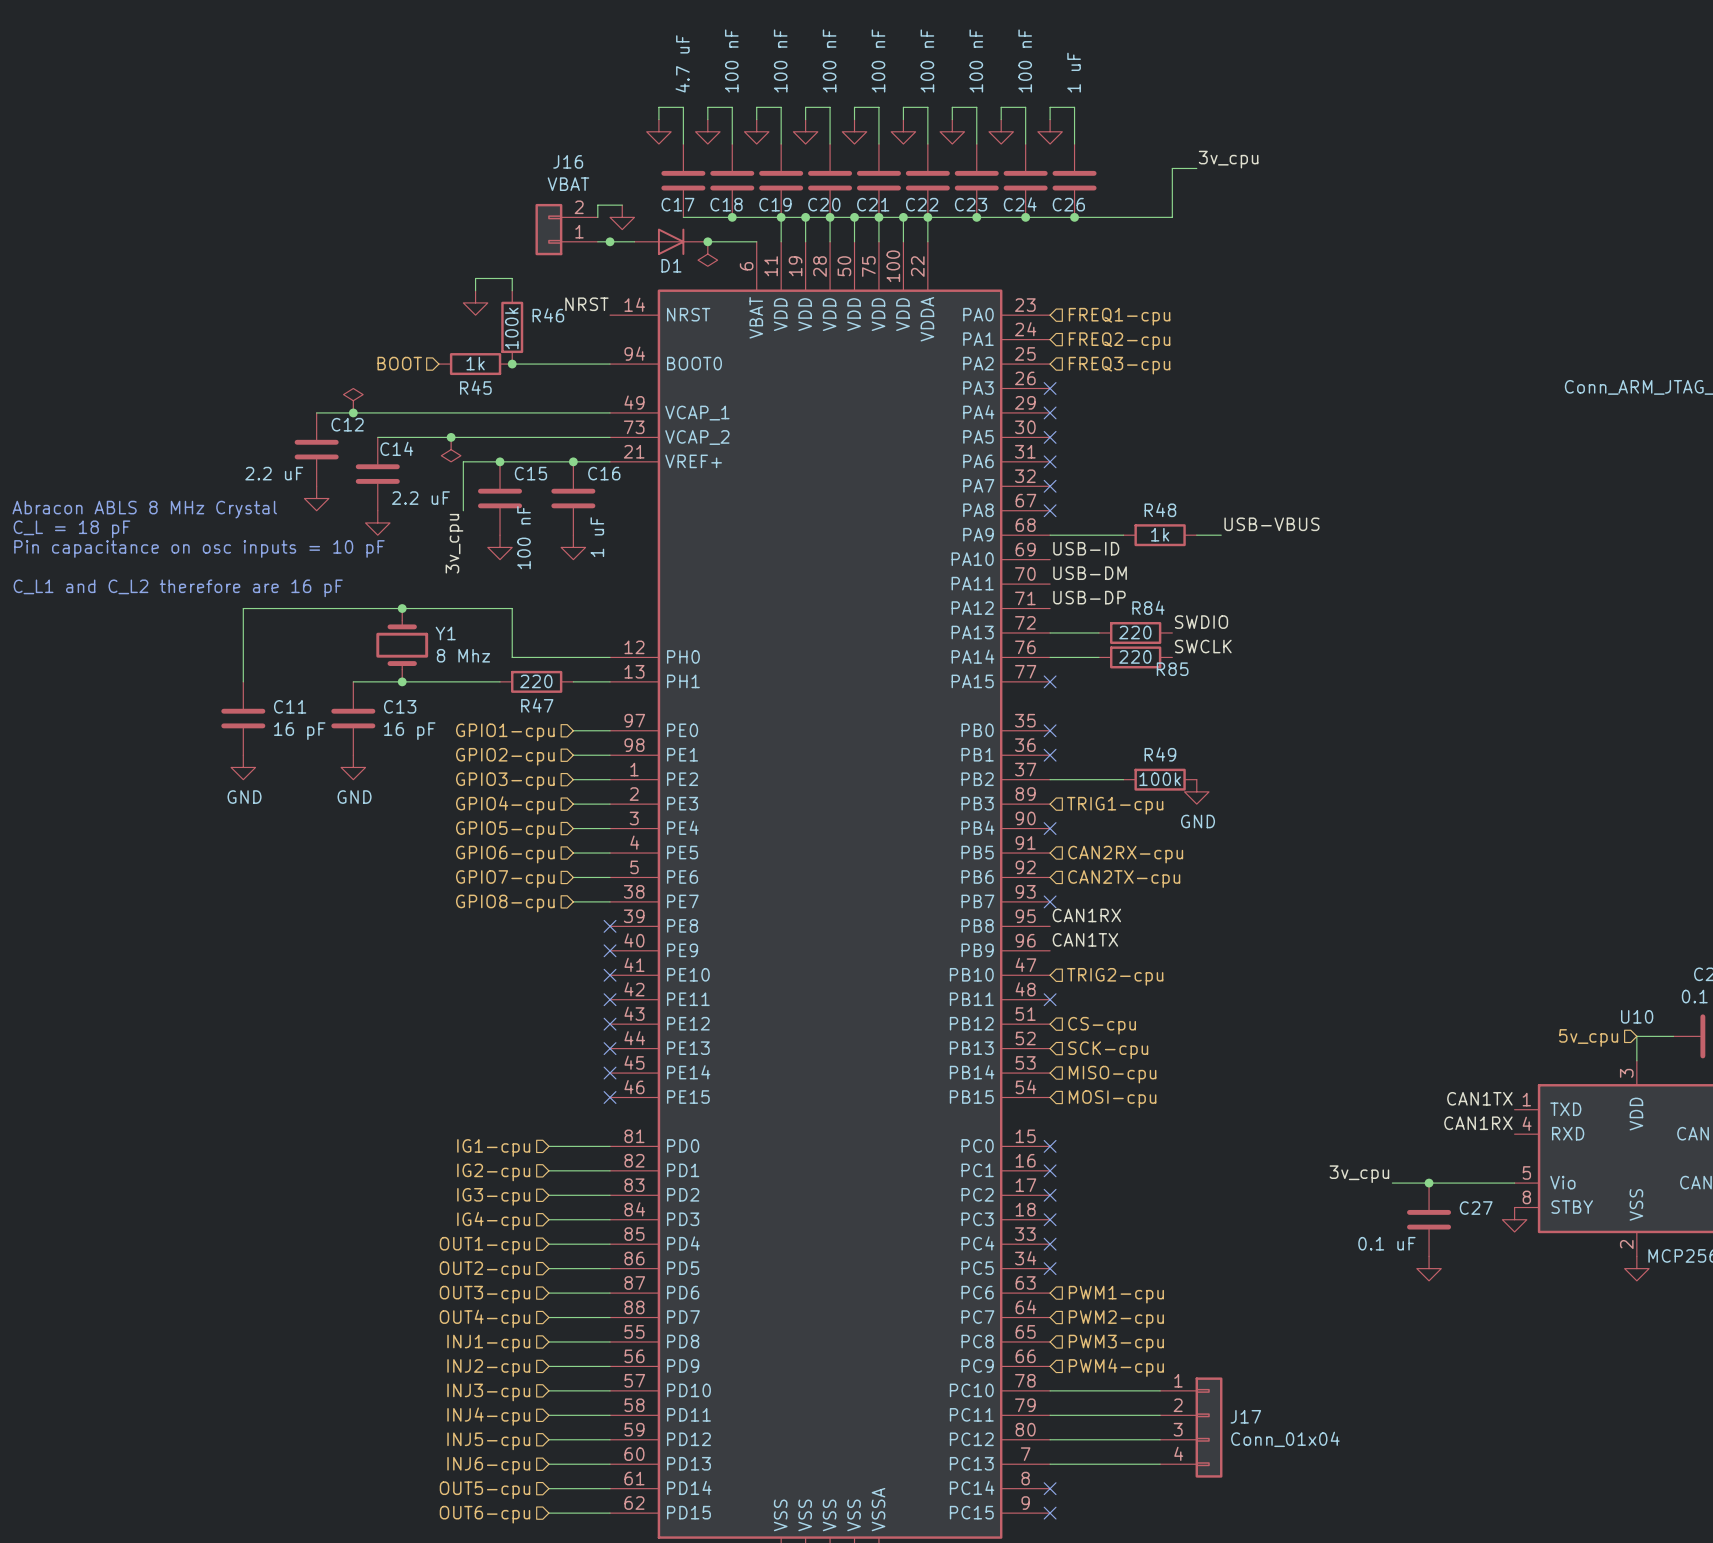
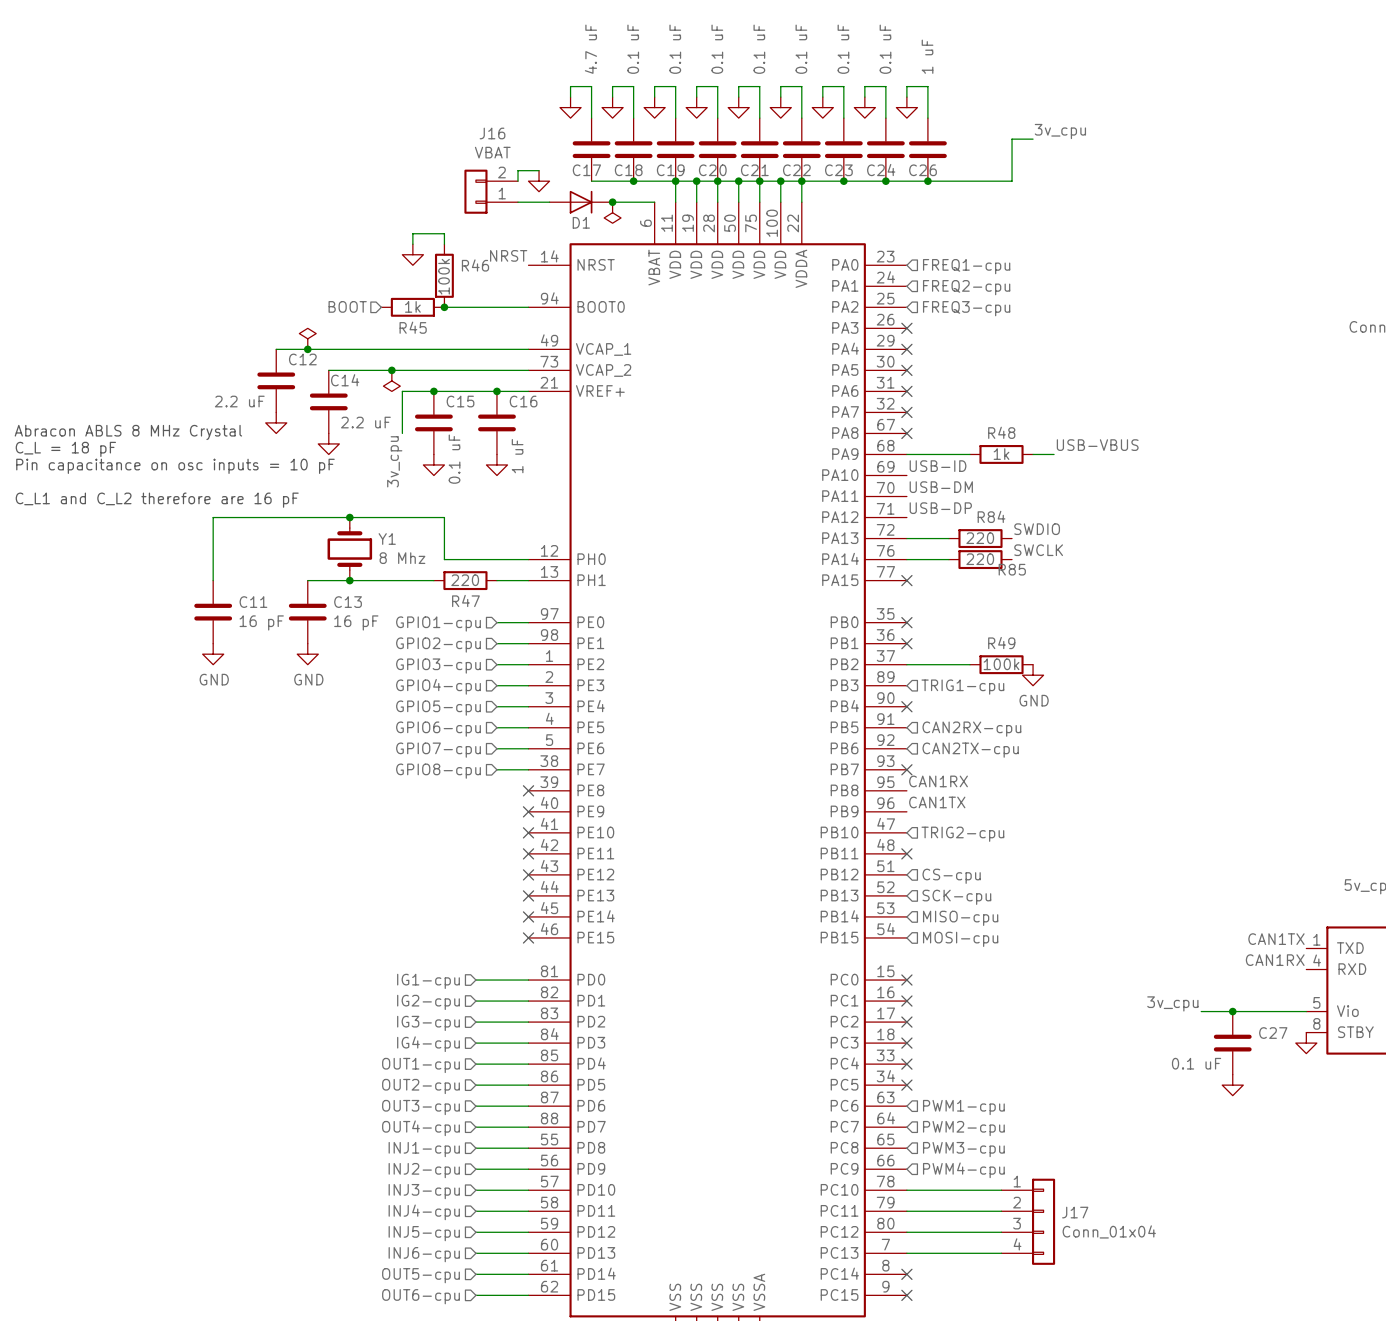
C18 value: 100 nF (731, 60) -> 0.1 uF (633, 49)
C19 value: 100 nF (780, 60) -> 0.1 uF (675, 49)
C20 value: 100 nF (829, 60) -> 0.1 uF (717, 49)
C21 value: 100 nF (878, 60) -> 0.1 uF (759, 49)
C22 value: 100 nF (927, 60) -> 0.1 uF (801, 49)
C23 value: 100 nF (976, 60) -> 0.1 uF (843, 49)
C24 value: 100 nF (1025, 60) -> 0.1 uF (885, 49)
junction: (610, 241) -> none
C15 value: 100 nF (524, 537) -> 0.1 uF (454, 459)

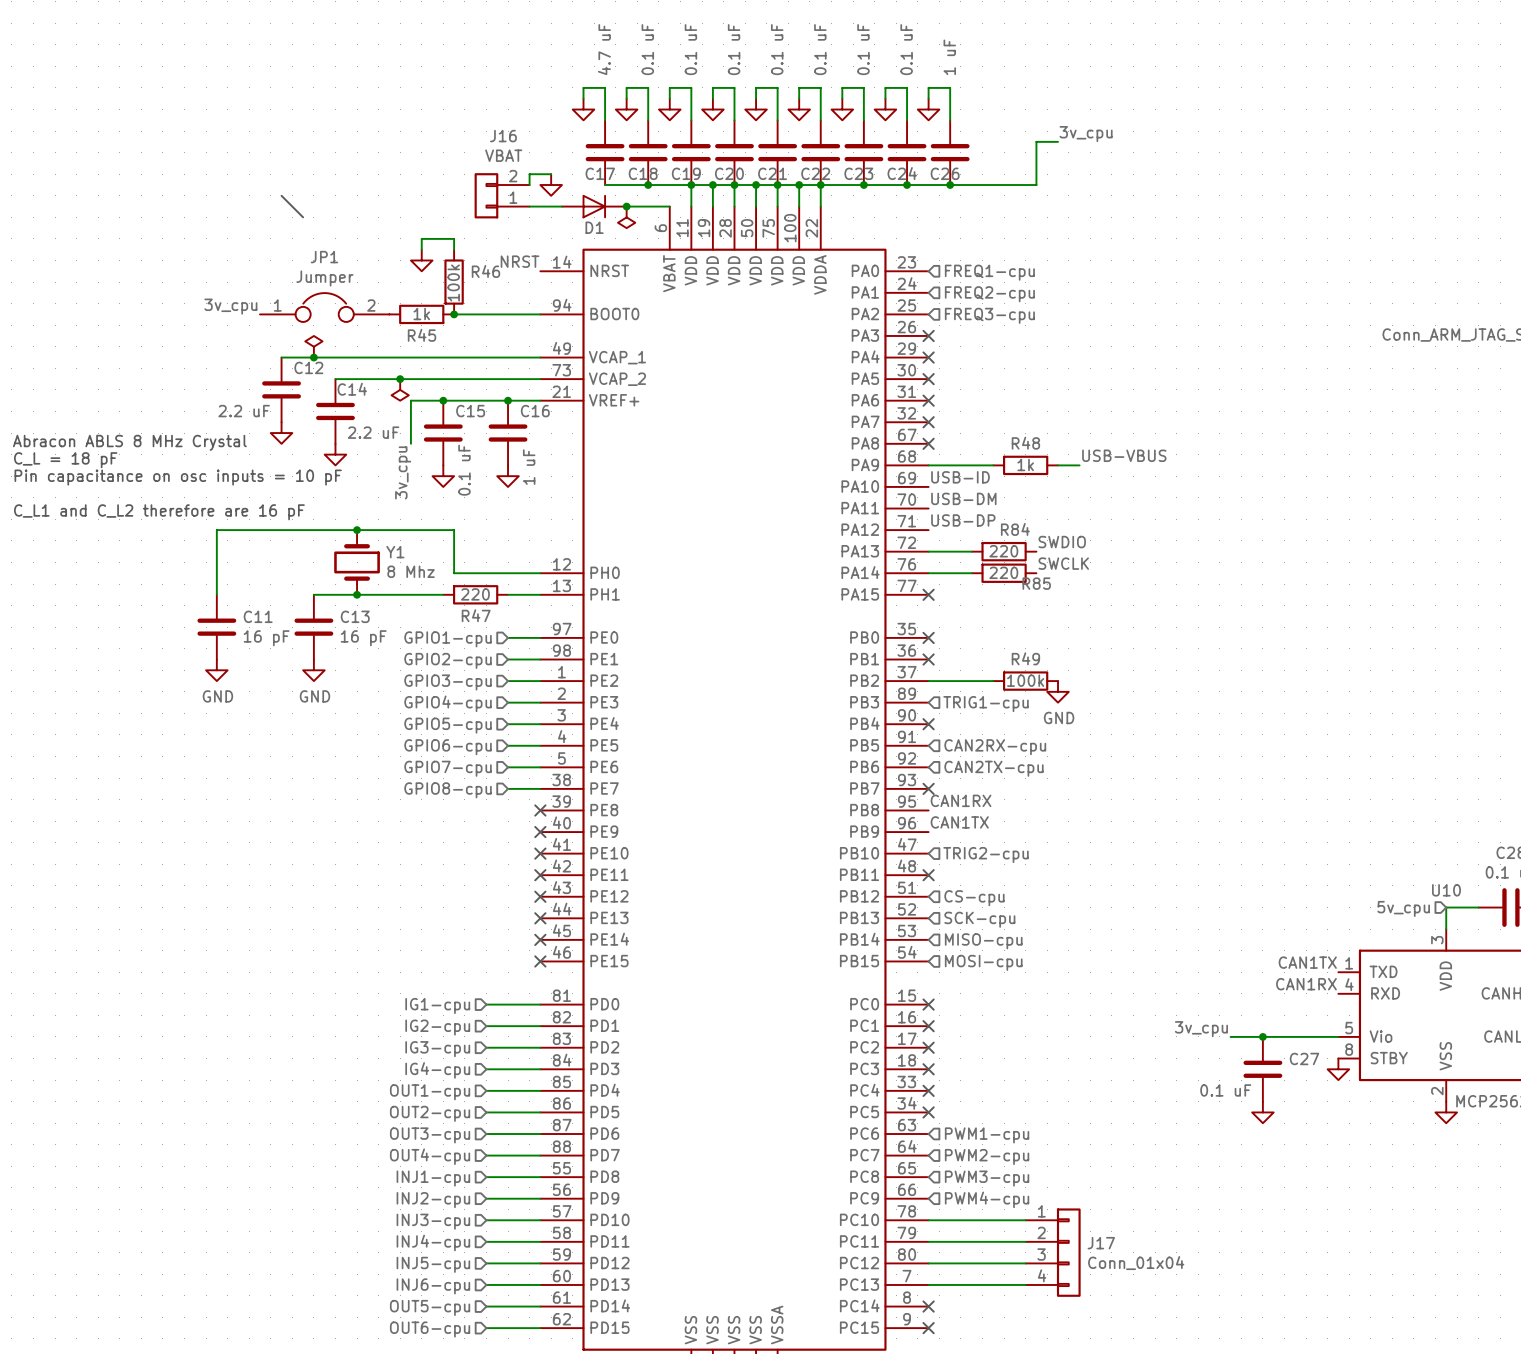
bus: none -> (281, 195) (303, 217)
label: none -> 3v_cpu (230, 306)
JP1: none -> Jumper (324, 307)
hierarchical label: BOOT (347, 306) -> none

